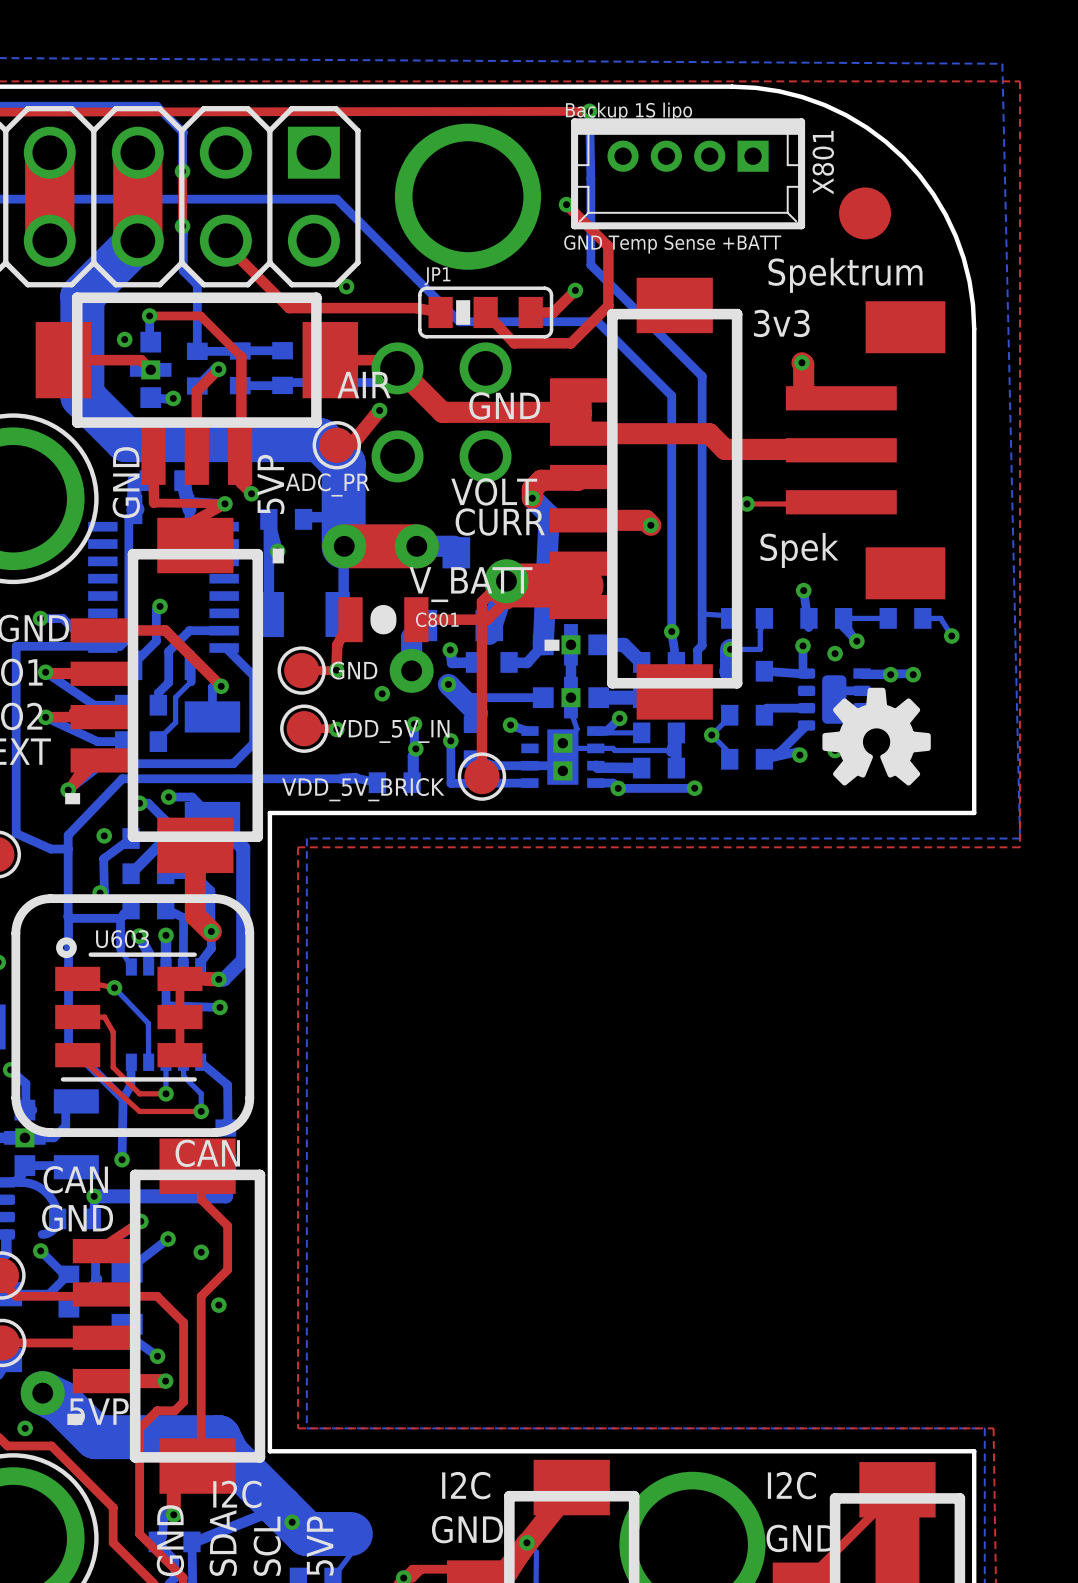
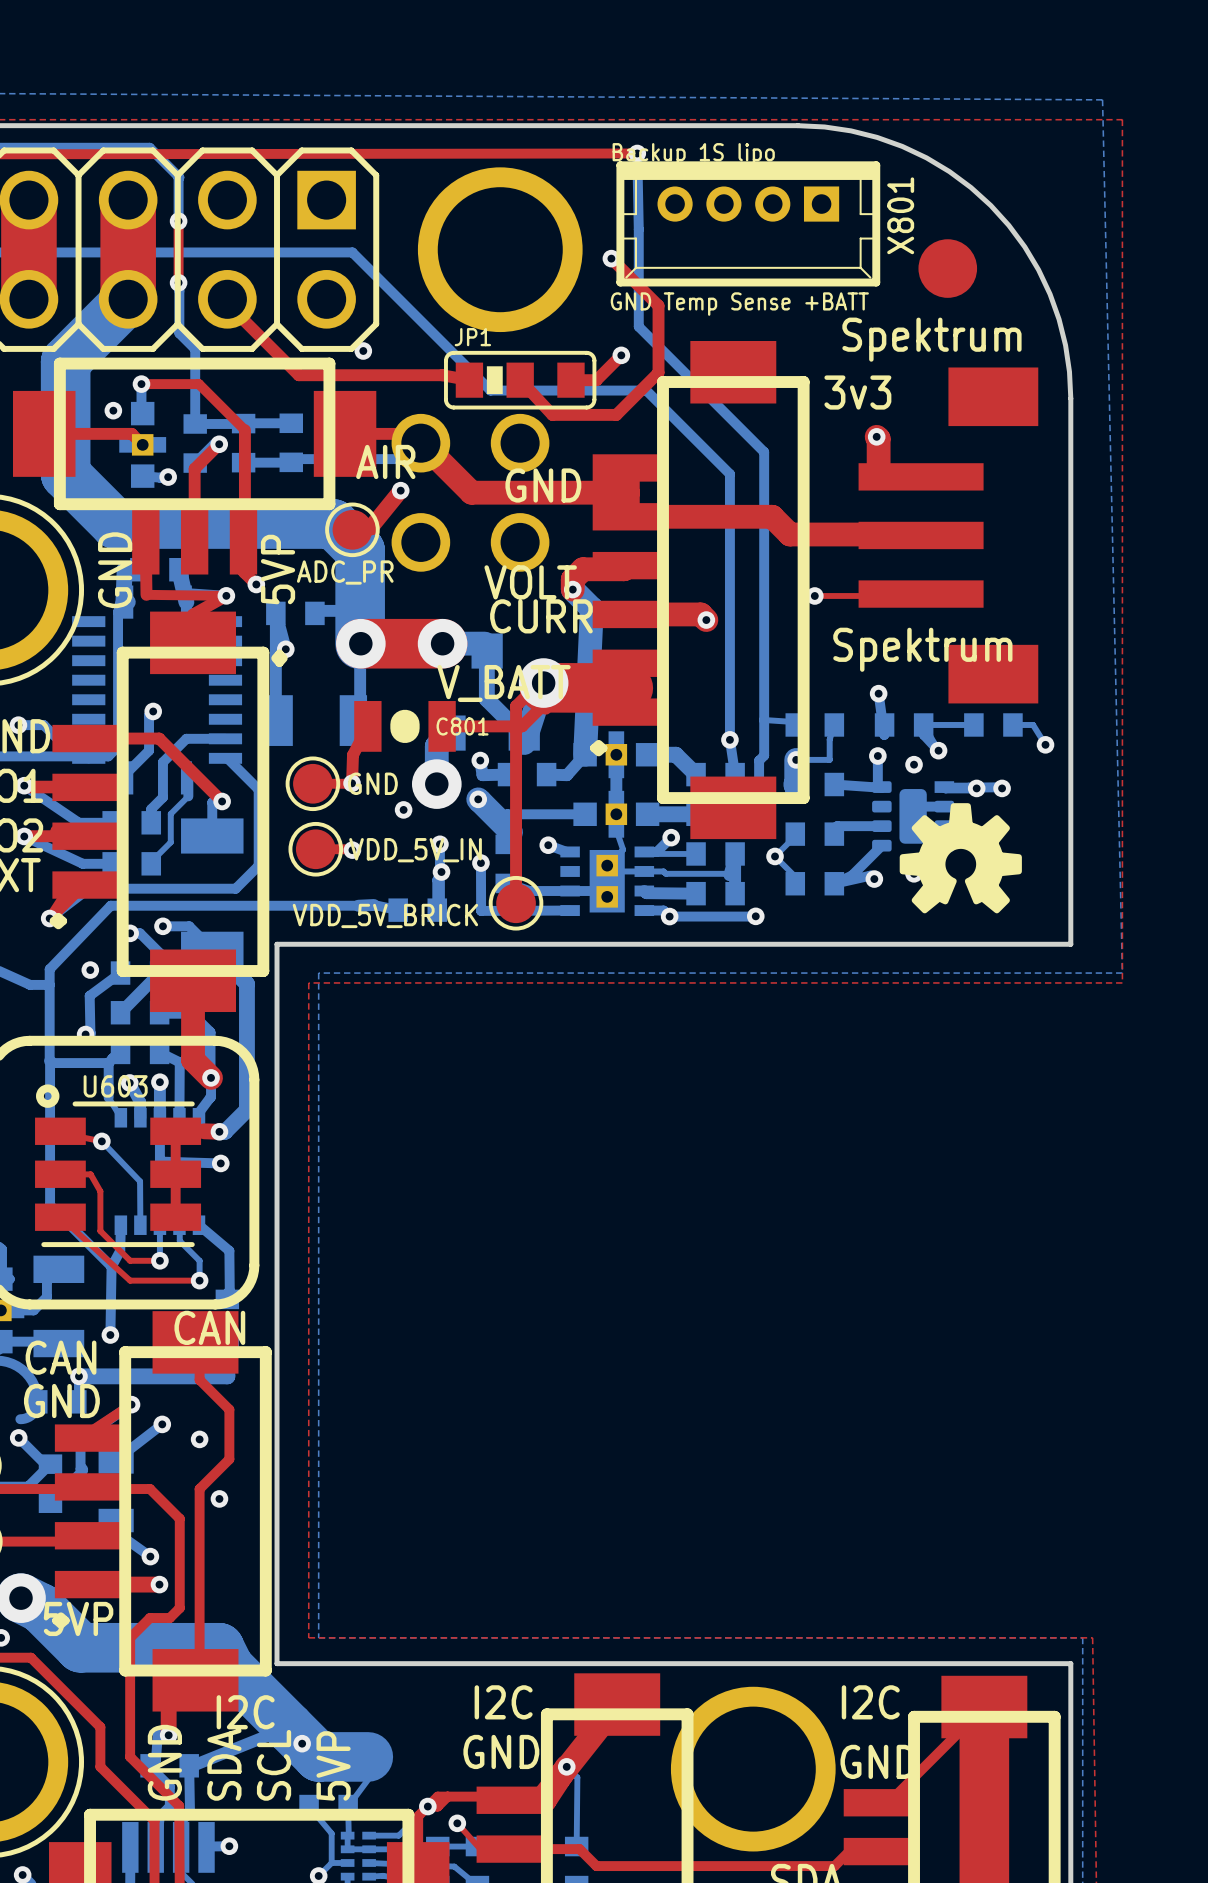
bottom track: none -> (486, 646) (486, 699) (520, 732)
text: Spek (799, 550) -> Spektrum (922, 649)

